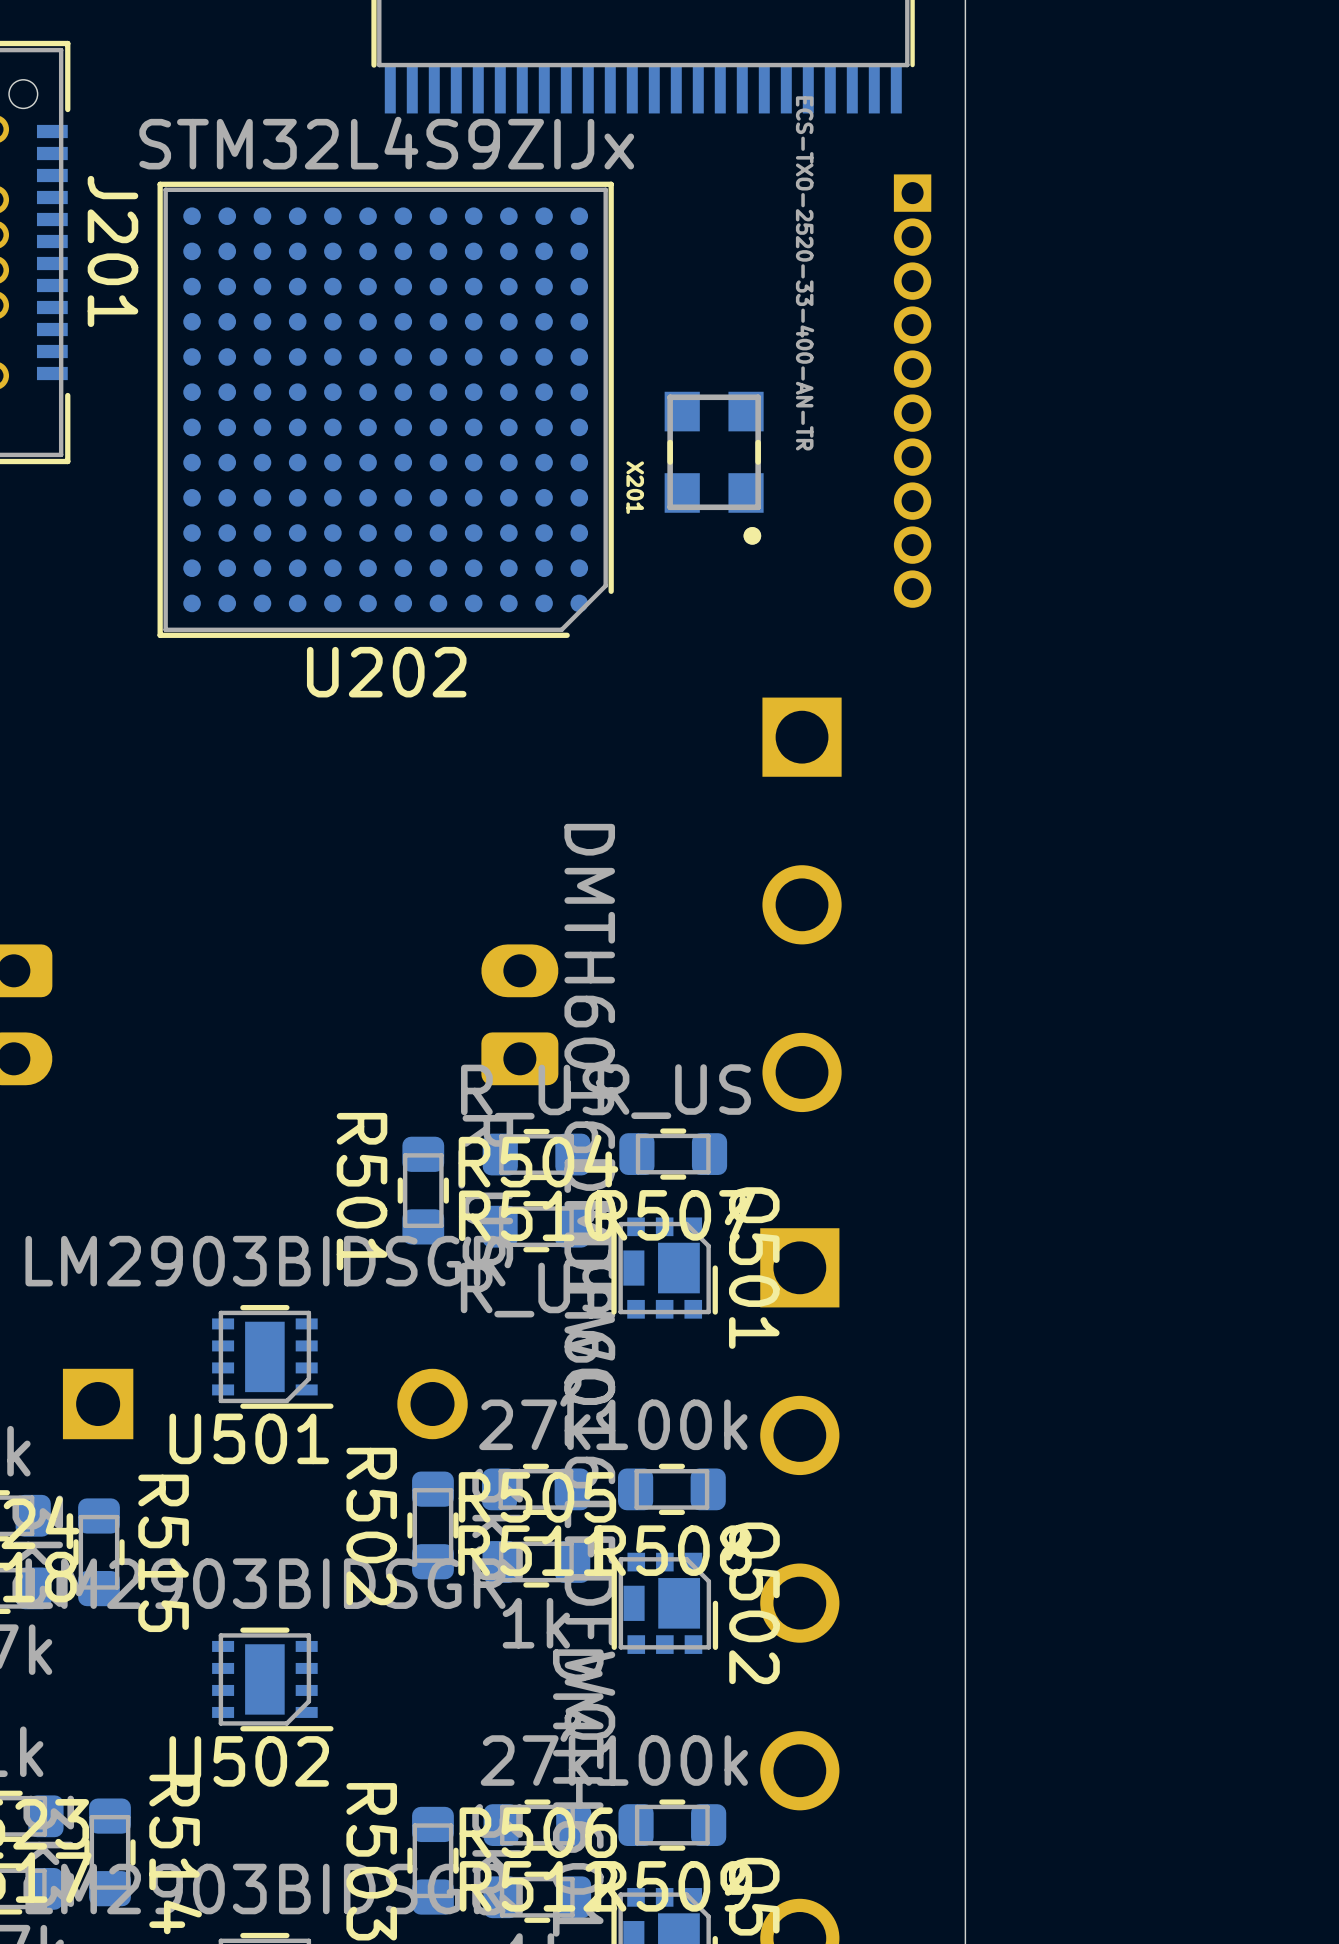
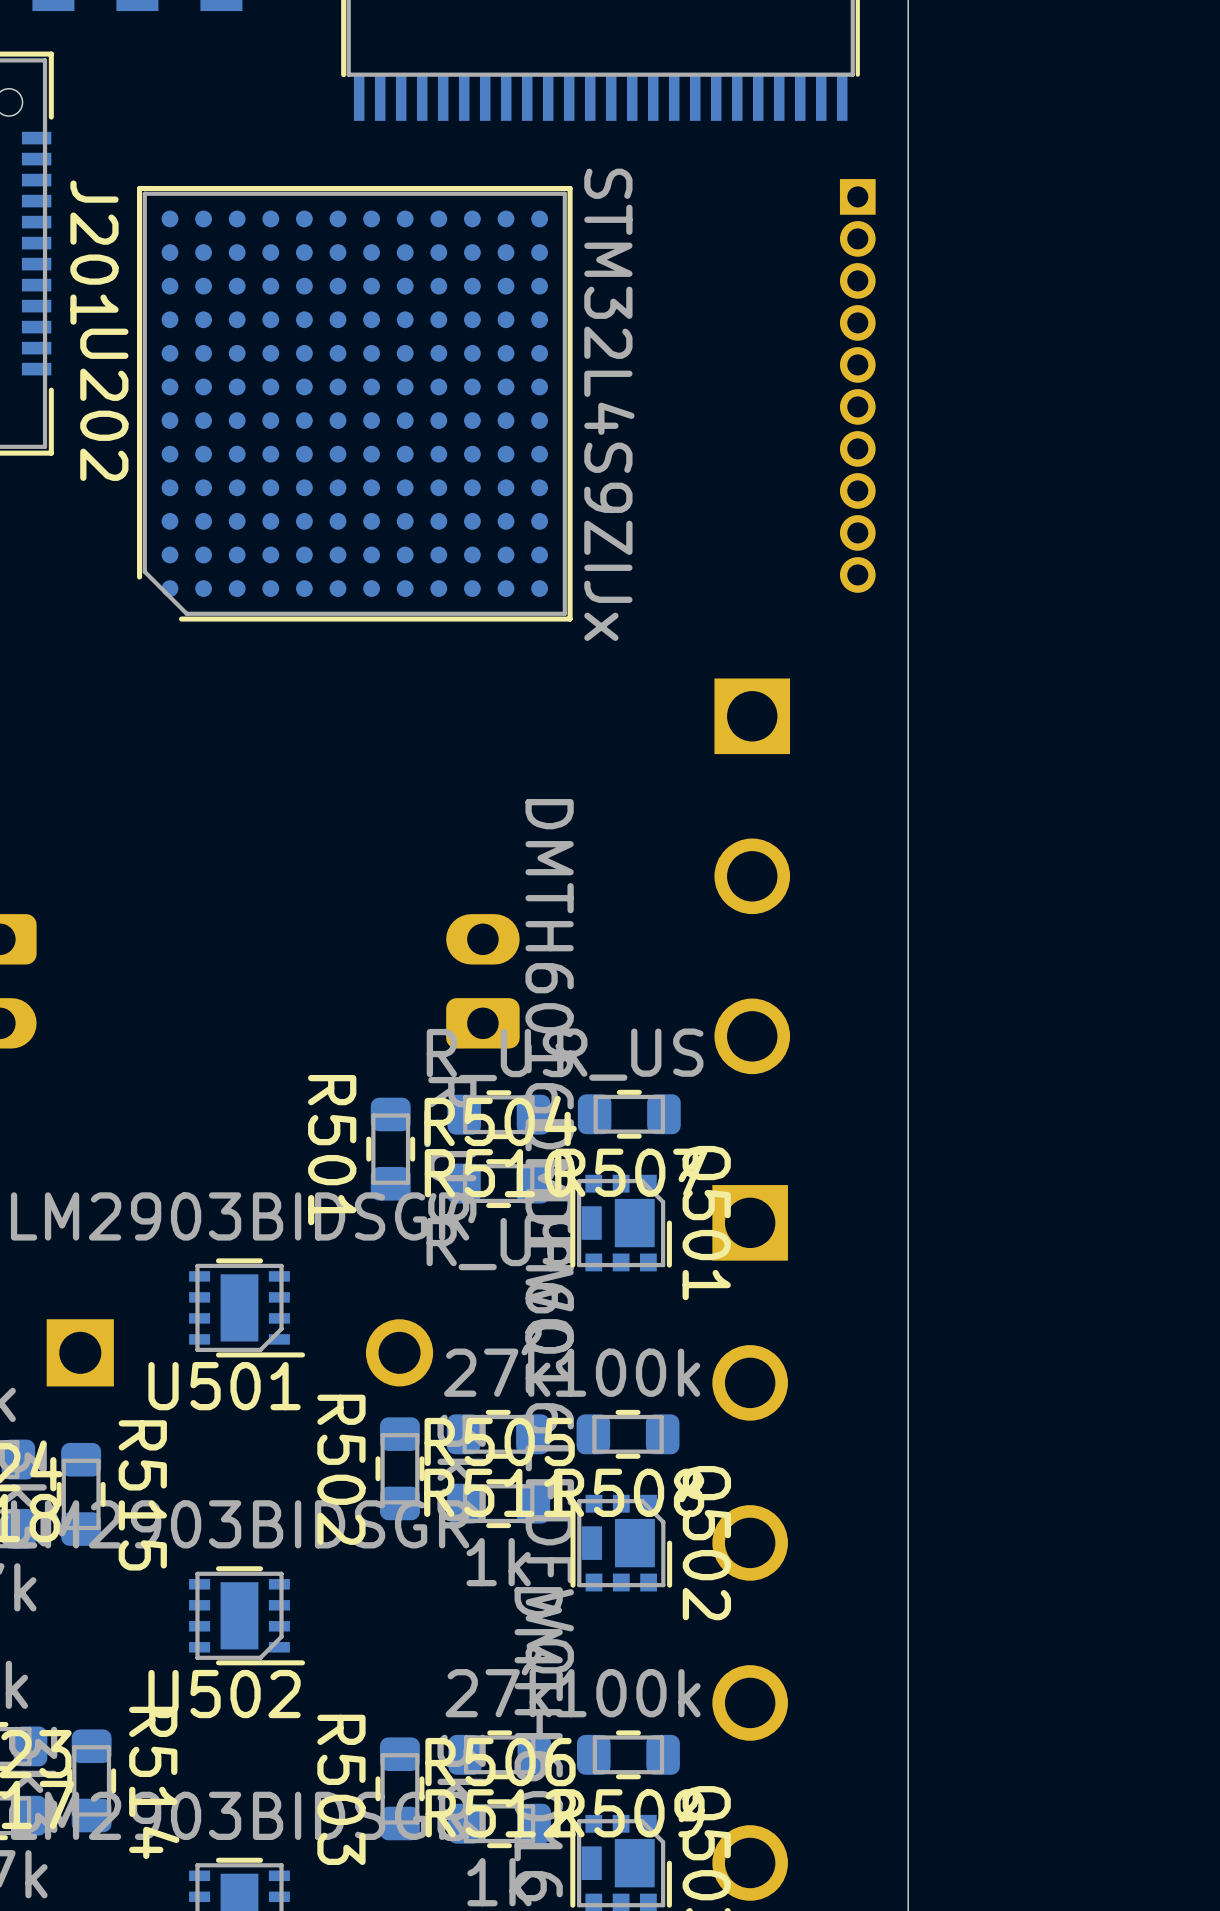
U202 rotation: 0° (385, 409) -> 90° clockwise (354, 403)
X201: ECS-TXO-2520-33-400-AN-TR (714, 468) -> none

